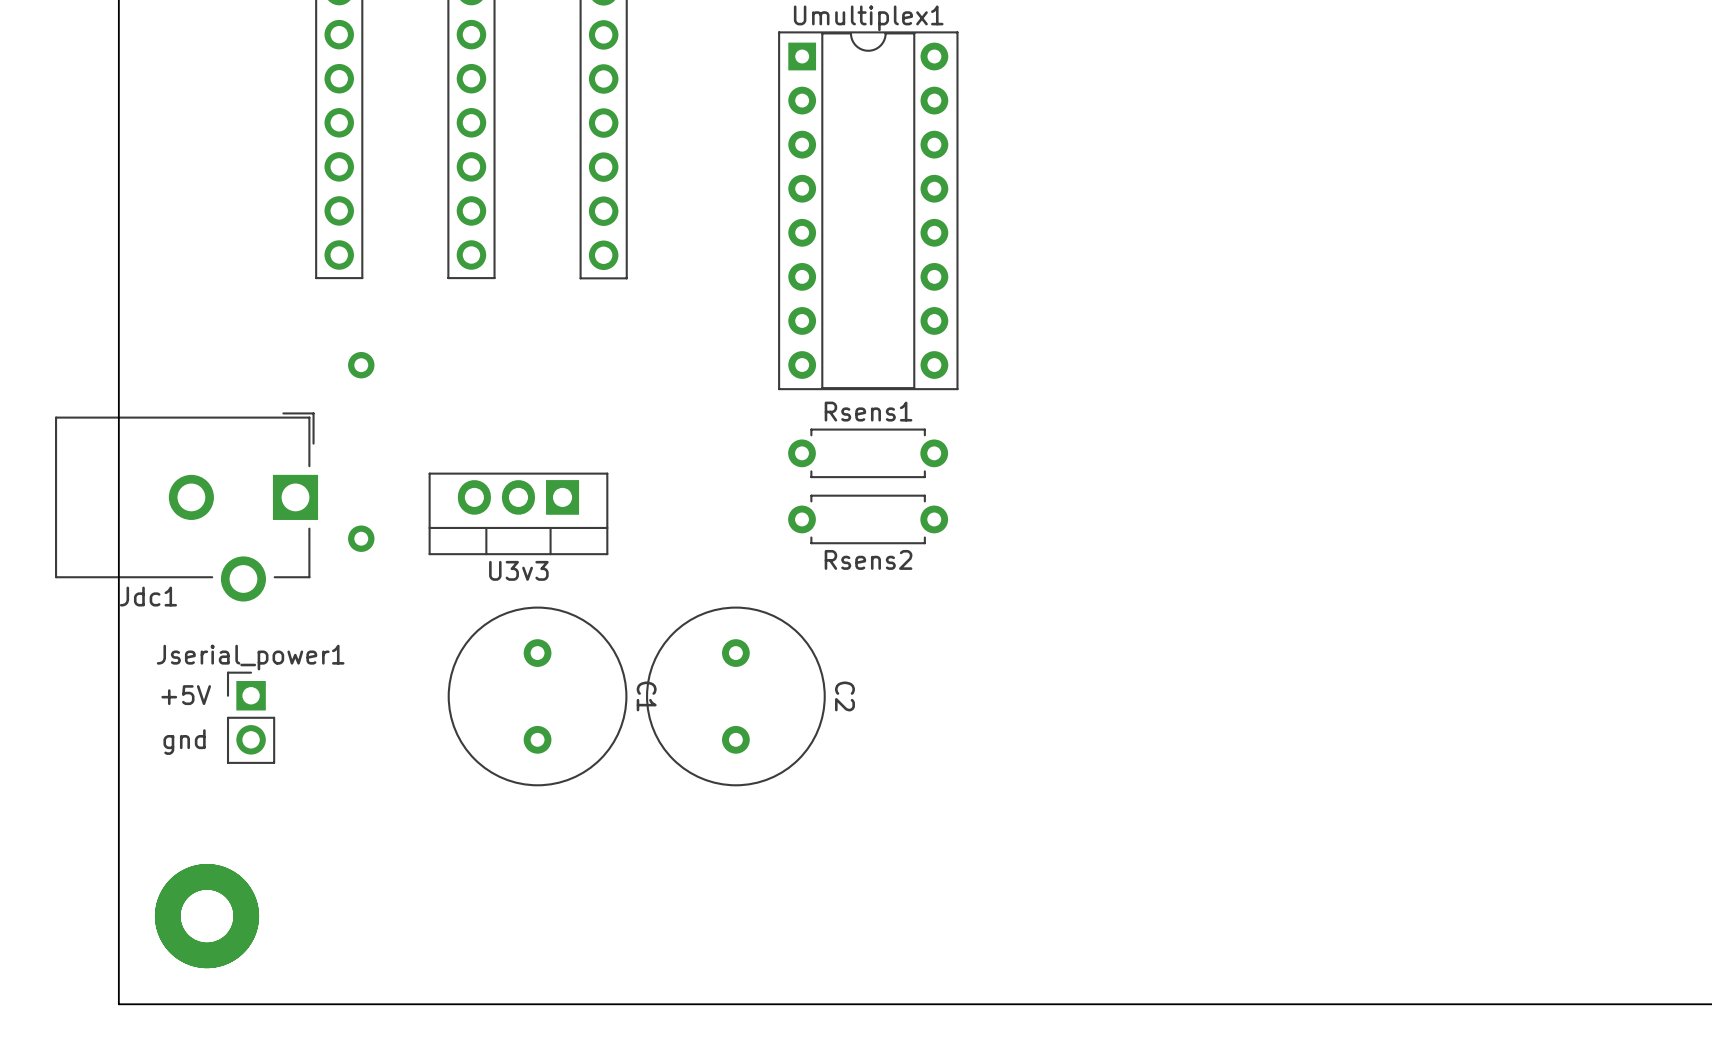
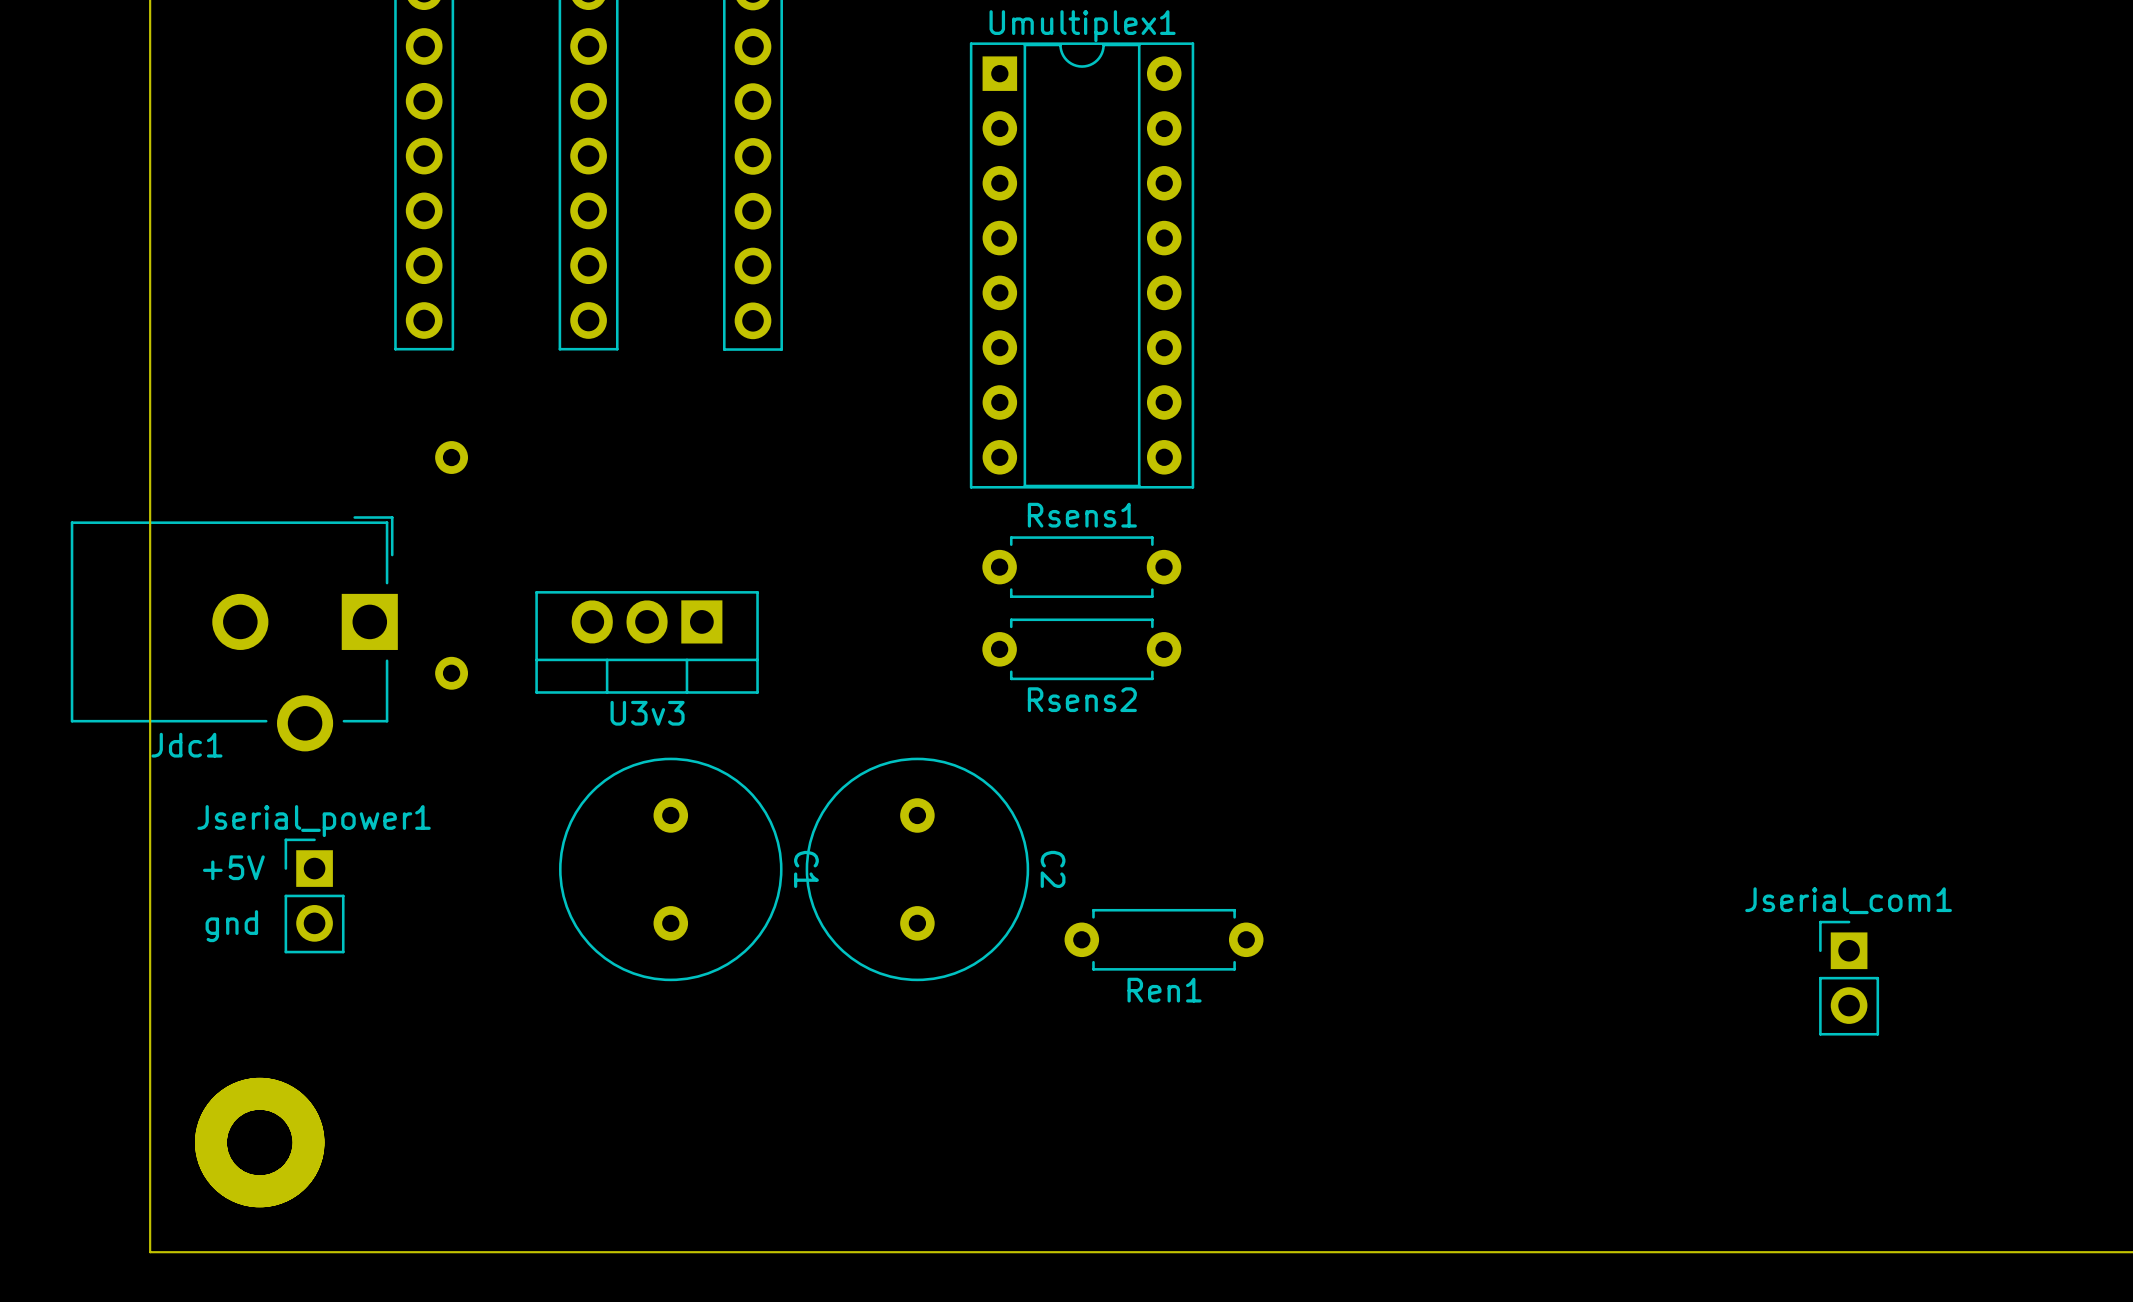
Ren1: none -> (1164, 939)
Jserial_com1: none -> (1849, 978)

